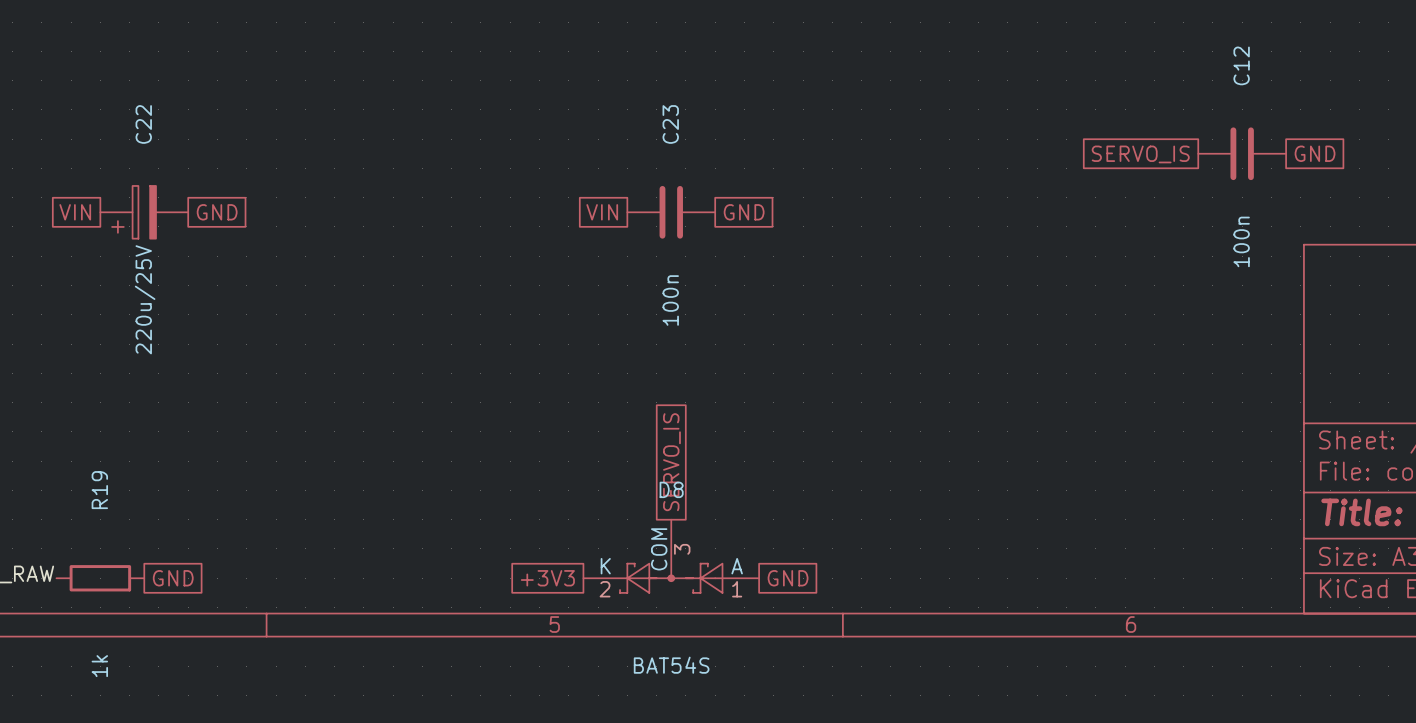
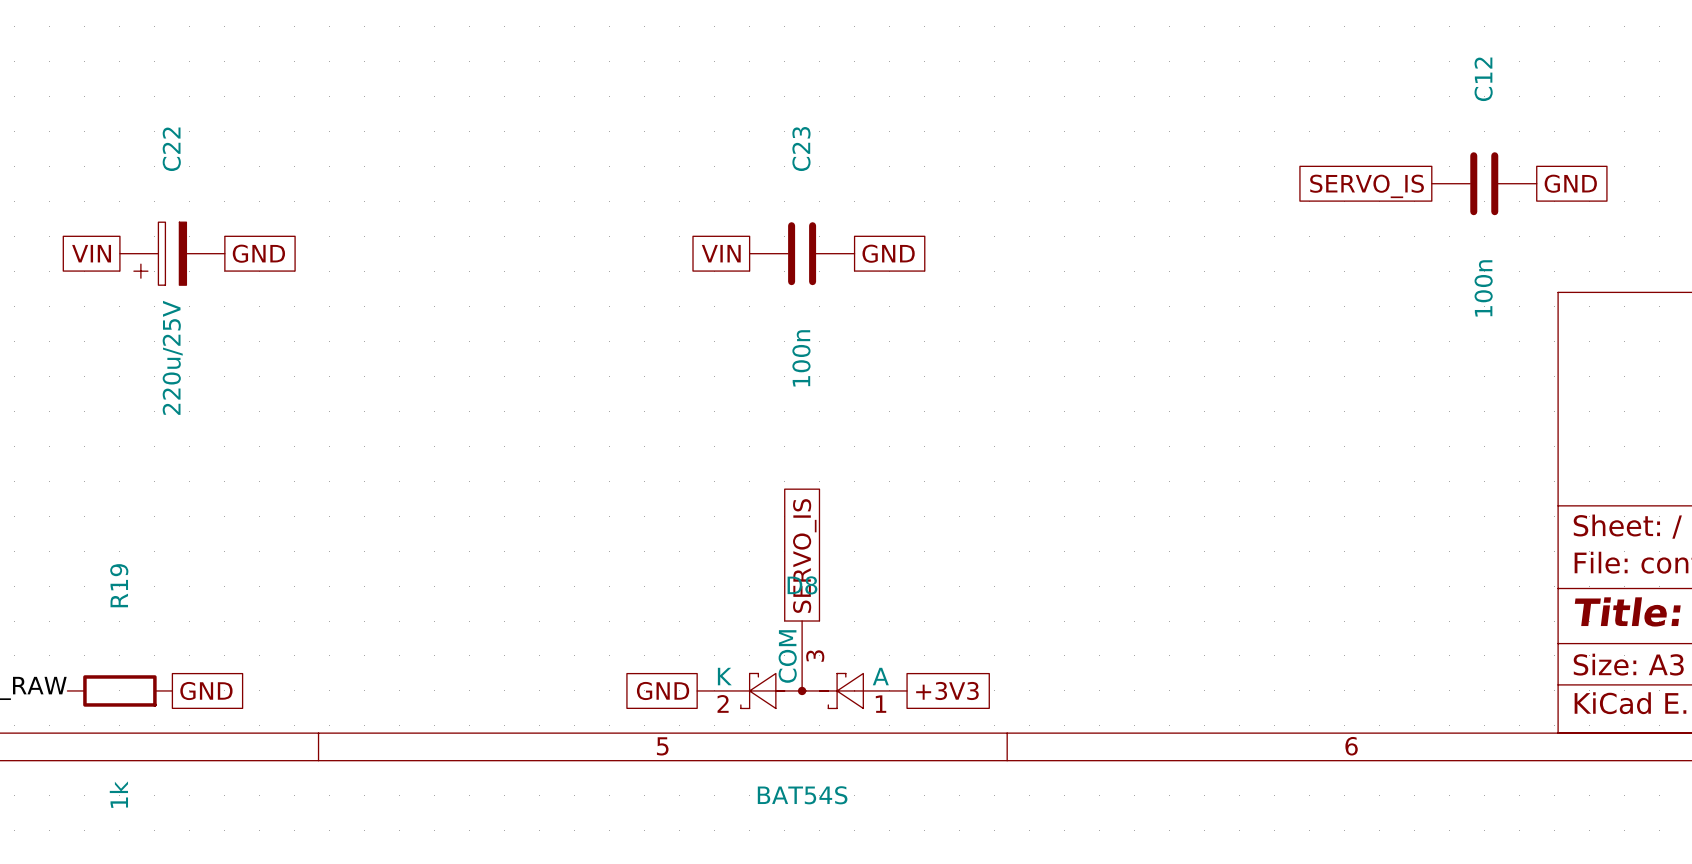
global label: +3V3 (547, 578) -> GND (663, 690)
global label: GND (788, 578) -> +3V3 (947, 690)

